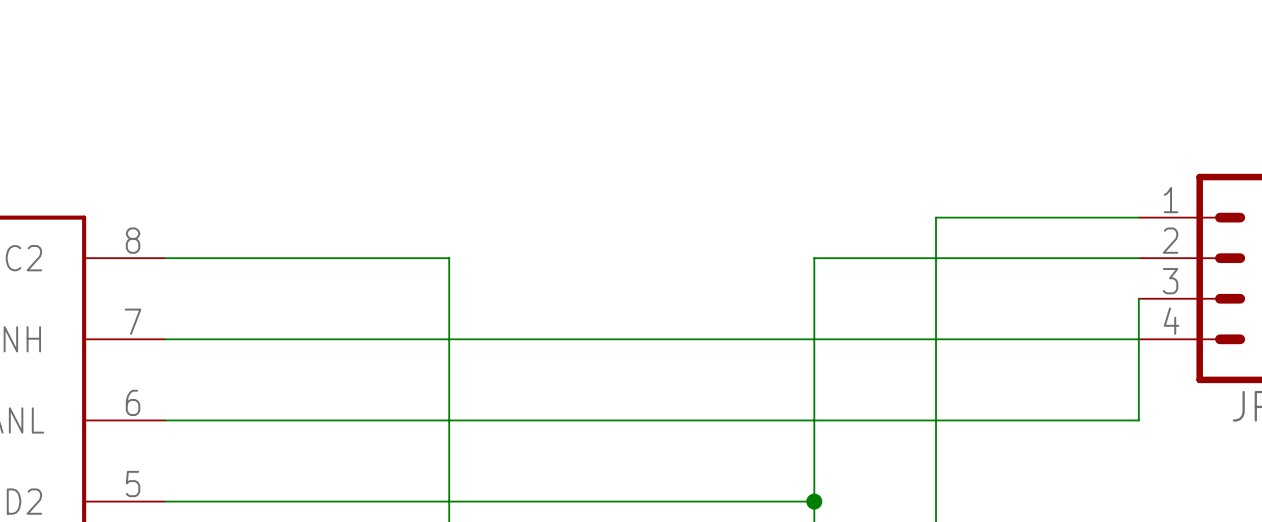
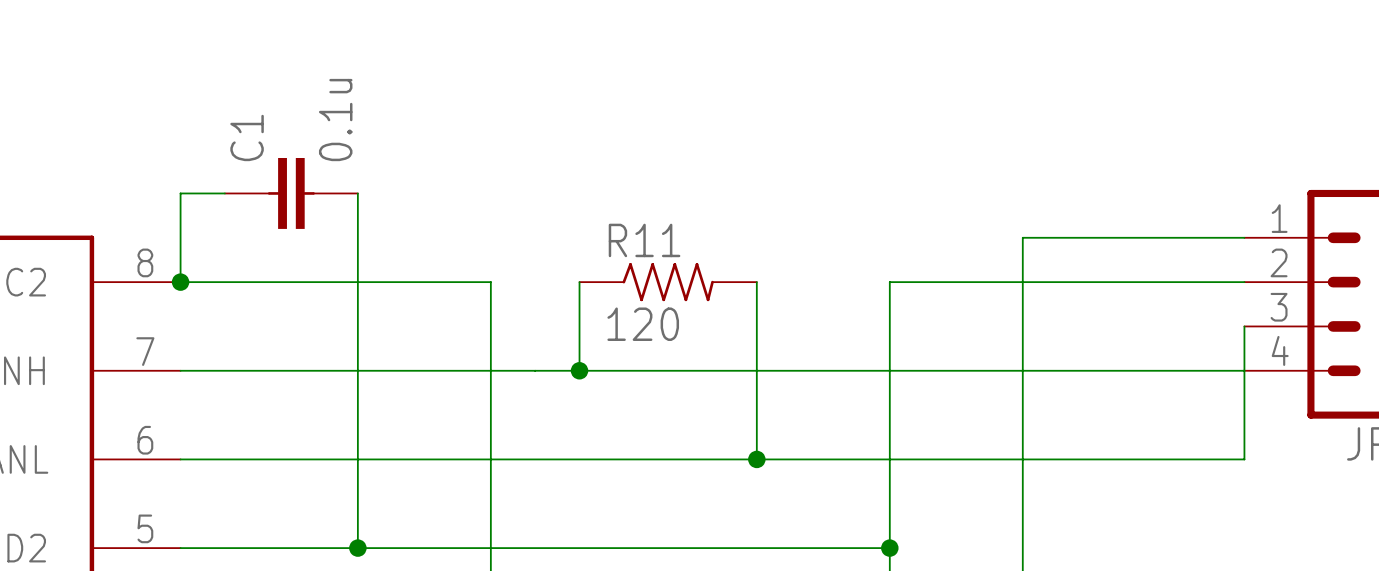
wire: none -> (224, 193) (180, 193) (180, 282)
C1: none -> 0.1u (291, 193)
wire: none -> (357, 193) (357, 548)
junction: none -> (180, 282)
wire: none -> (579, 282) (579, 370)
R11: none -> 120 (668, 282)
wire: none -> (756, 282) (756, 459)
junction: none -> (579, 370)
junction: none -> (756, 459)
junction: none -> (357, 548)

